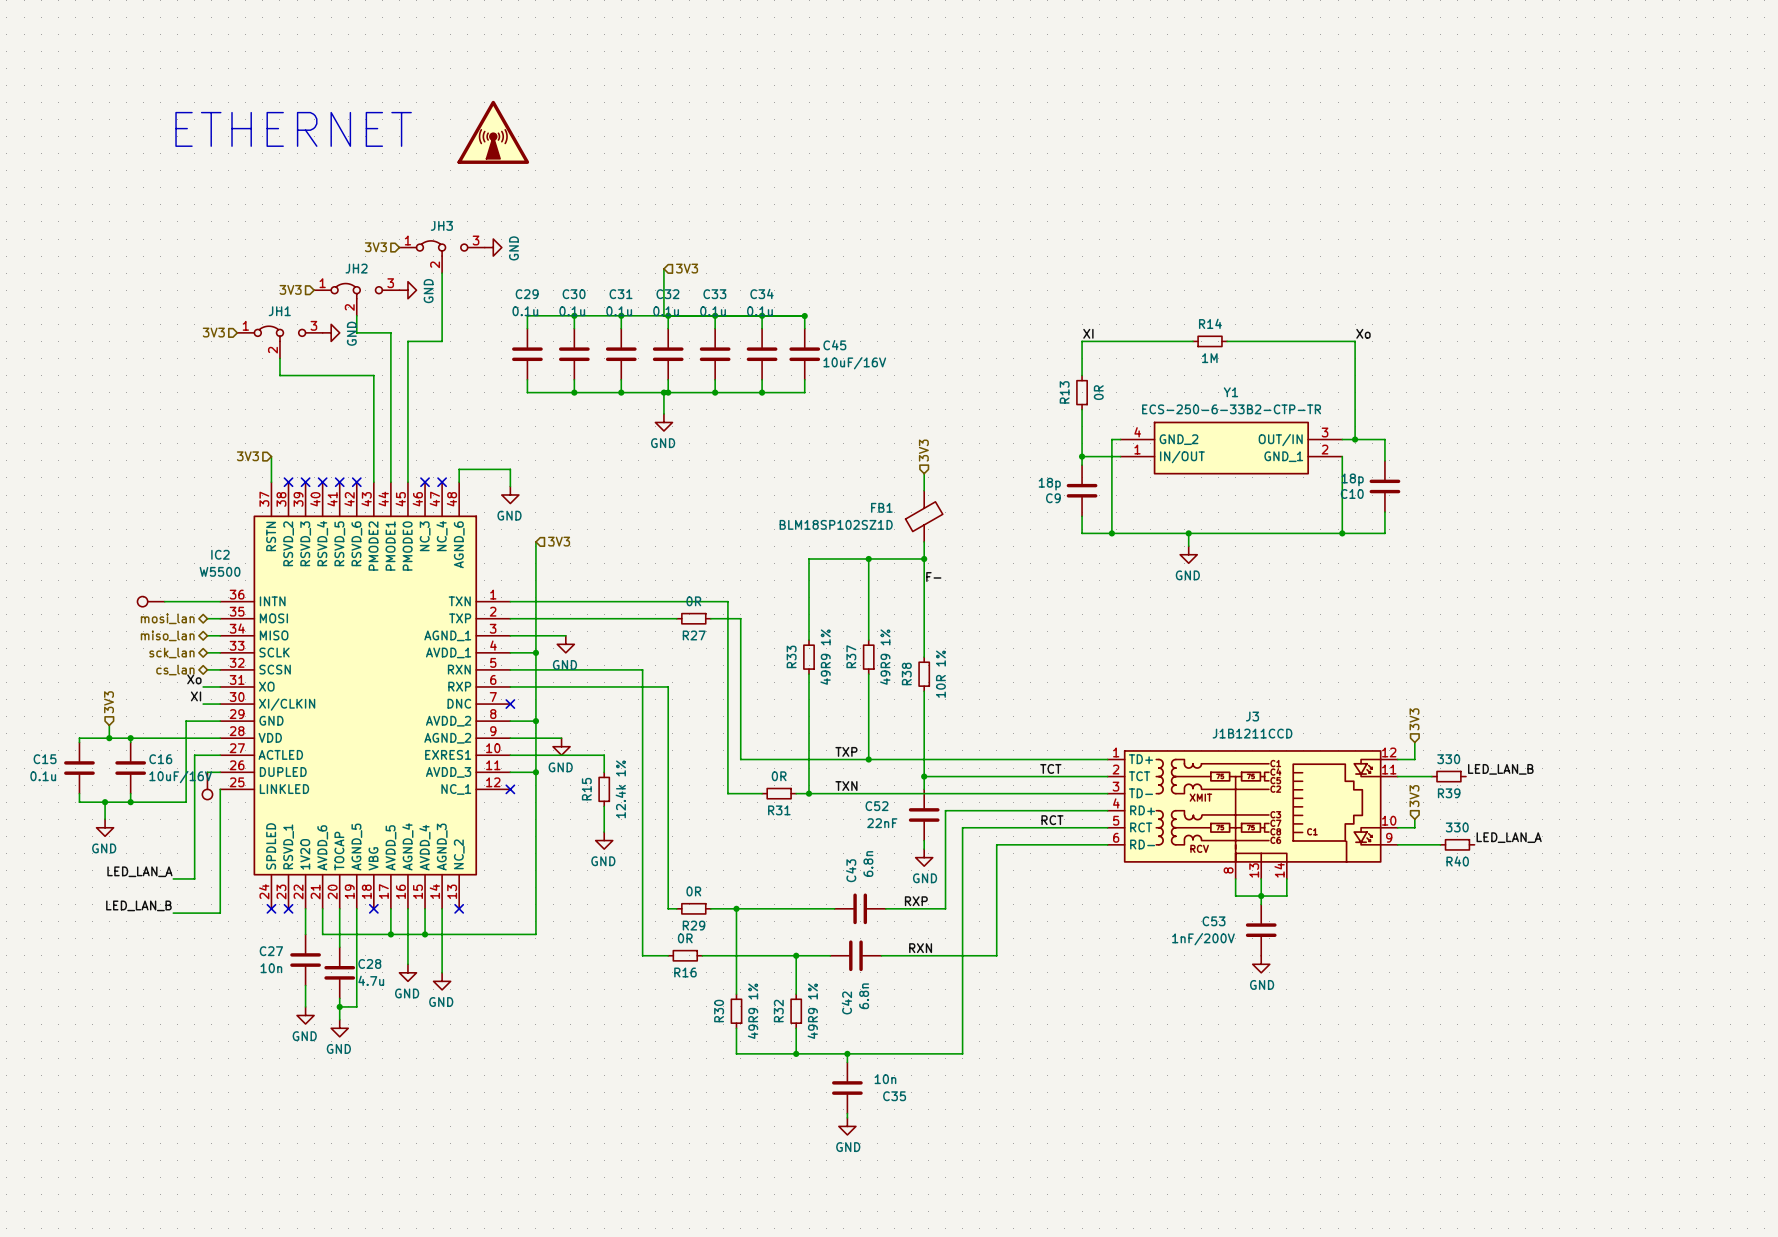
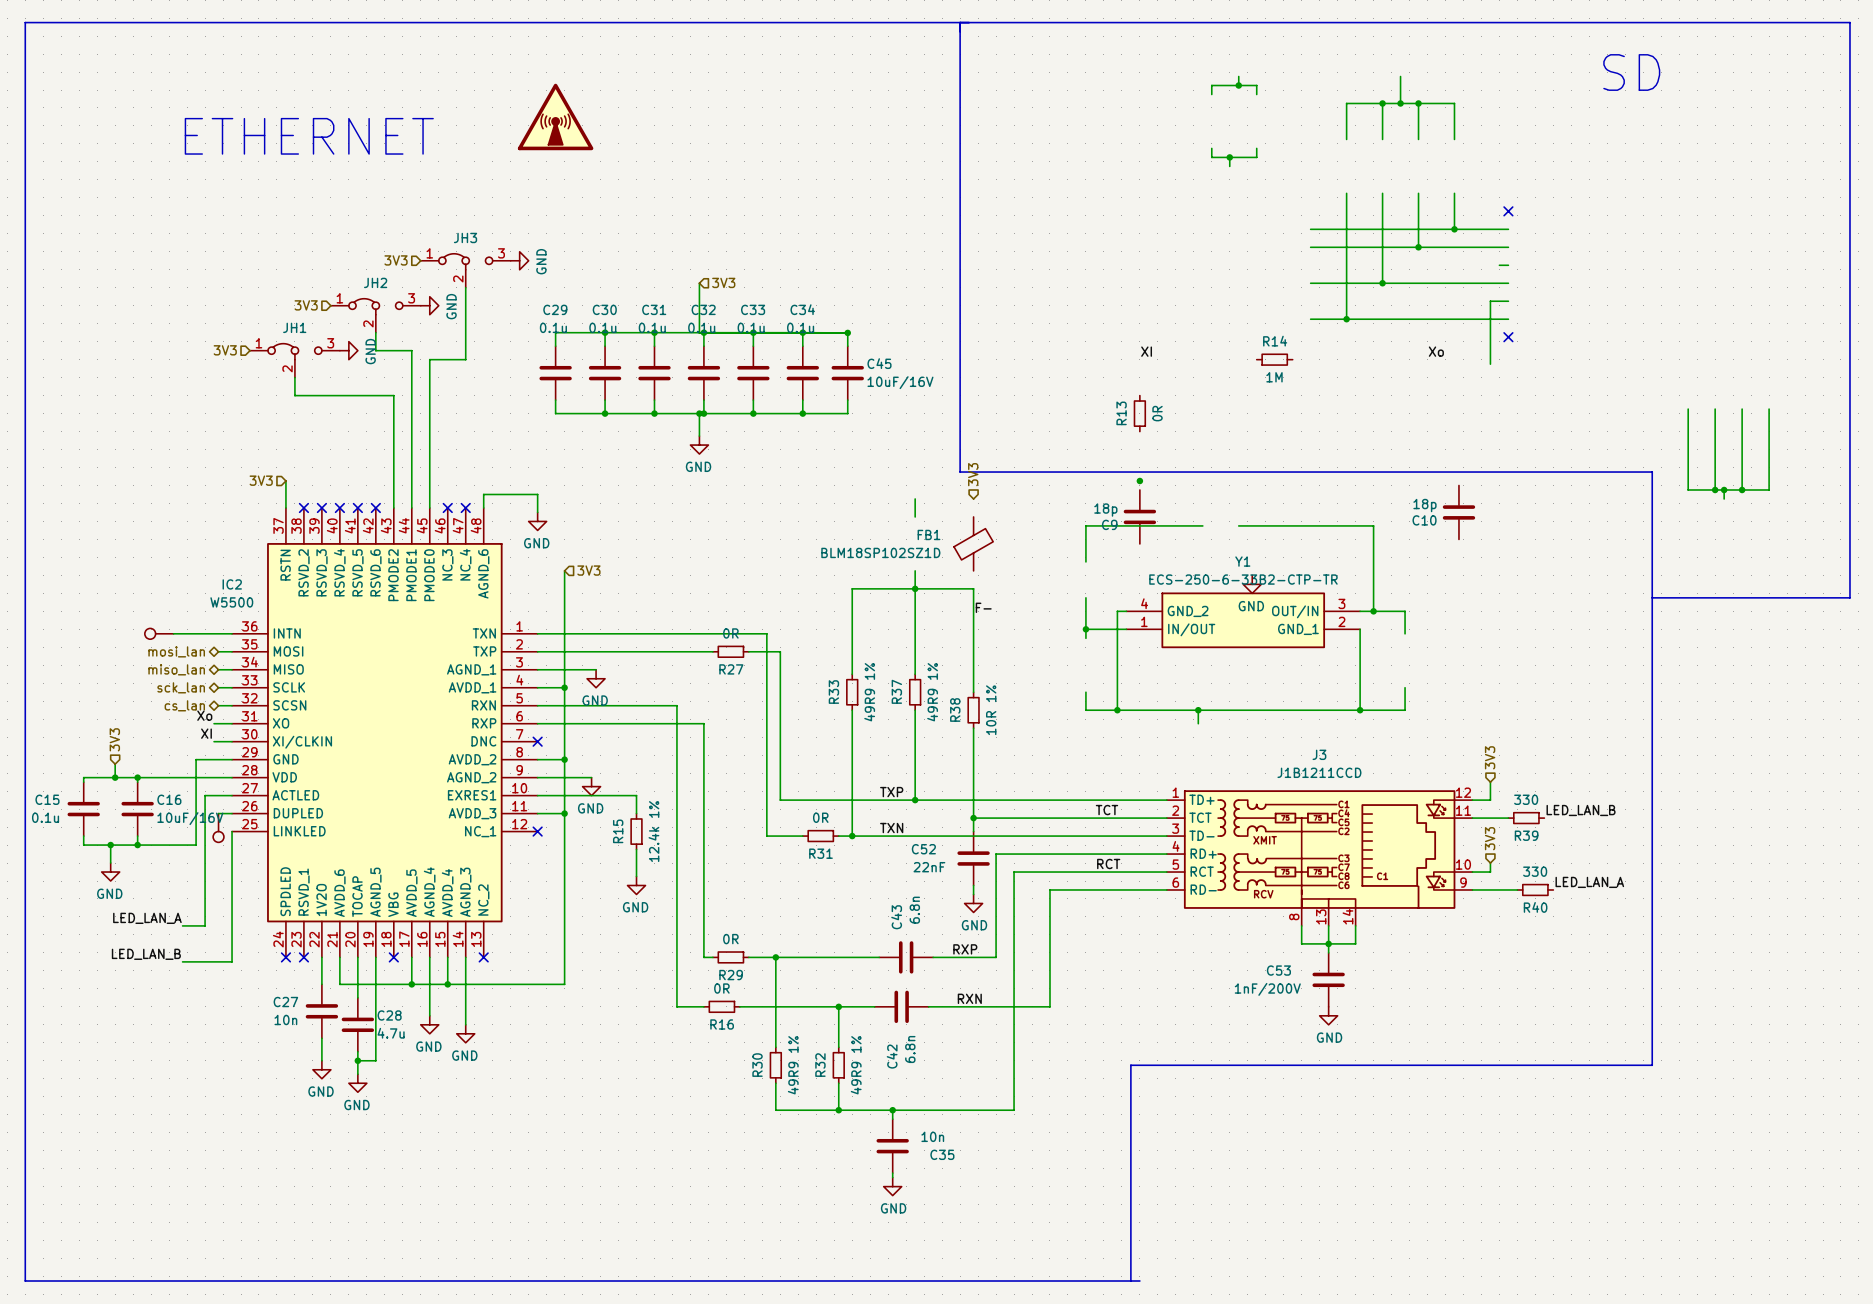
line: none -> (960, 22) (960, 472) (1652, 472) (1652, 1065) (1130, 1065) (1130, 1281)
text: none -> SD (1631, 72)
wire: none -> (1238, 76) (1238, 85)
wire: none -> (1400, 76) (1400, 103)
junction: none -> (1238, 85)
wire: none -> (1211, 94) (1211, 85) (1256, 85) (1256, 94)
wire: none -> (1382, 103) (1382, 139)
junction: none -> (1382, 103)
junction: none -> (1400, 103)
wire: none -> (1418, 103) (1418, 139)
junction: none -> (1418, 103)
power symbol position: (493, 132) -> (555, 116)
wire: none -> (1346, 139) (1346, 103) (1454, 103) (1454, 139)
wire: none -> (1211, 148) (1211, 157) (1256, 157) (1256, 148)
wire: none -> (1229, 157) (1229, 166)
junction: none -> (1229, 157)
wire: none -> (1346, 193) (1346, 319)
wire: none -> (1382, 193) (1382, 283)
wire: none -> (1418, 193) (1418, 247)
wire: none -> (1454, 193) (1454, 229)
no-connect mark: none -> (1508, 211)
wire: none -> (1310, 229) (1508, 229)
junction: none -> (1454, 229)
wire: none -> (1310, 247) (1508, 247)
junction: none -> (1418, 247)
wire: none -> (1499, 265) (1508, 265)
wire: none -> (1310, 283) (1508, 283)
junction: none -> (1382, 283)
wire: none -> (1508, 301) (1490, 301) (1490, 364)
wire: none -> (1310, 319) (1508, 319)
junction: none -> (1346, 319)
no-connect mark: none -> (1508, 337)
wire: (1192, 341) (1082, 341) (1082, 375) -> (1202, 525) (1085, 525) (1085, 561)
wire: (1227, 341) (1355, 341) (1355, 439) -> none
wire: none -> (1688, 409) (1688, 489) (1769, 489) (1769, 409)
wire: none -> (1715, 409) (1715, 489)
wire: none -> (1742, 409) (1742, 489)
wire: (1082, 409) (1082, 465) -> none
wire: (1120, 439) (1111, 439) (1111, 533) -> (1126, 611) (1117, 611) (1117, 710)
wire: (1342, 439) (1384, 439) (1384, 460) -> (1360, 611) (1405, 611) (1405, 633)
junction: (1355, 439) -> none
Y1 position: (1231, 448) -> (1243, 620)
wire: (1082, 456) (1120, 456) -> (1085, 629) (1126, 629)
wire: (1342, 456) (1342, 533) -> (1360, 629) (1360, 710)
junction: none -> (1715, 489)
wire: none -> (1724, 489) (1724, 498)
junction: none -> (1724, 489)
junction: none -> (1742, 489)
wire: (924, 473) (924, 490) -> (915, 498) (915, 516)
wire: none -> (1238, 525) (1373, 525) (1373, 611)
wire: (1384, 512) (1384, 533) (1082, 533) (1082, 516) -> (1405, 687) (1405, 710) (1085, 710) (1085, 692)
junction: (1111, 533) -> none
wire: (1188, 533) (1188, 546) -> (1198, 710) (1198, 723)
junction: (1188, 533) -> none
junction: (1342, 533) -> none
wire: (924, 541) (924, 558) -> (915, 570) (915, 588)
junction: (924, 558) -> none
wire: none -> (1085, 597) (1085, 638)
line: none -> (1652, 597) (1849, 597) (1849, 22) (25, 22) (25, 1281) (1139, 1281)
junction: none -> (1373, 611)
junction: none -> (1085, 629)
junction: none -> (1117, 710)
junction: none -> (1198, 710)
junction: none -> (1360, 710)

